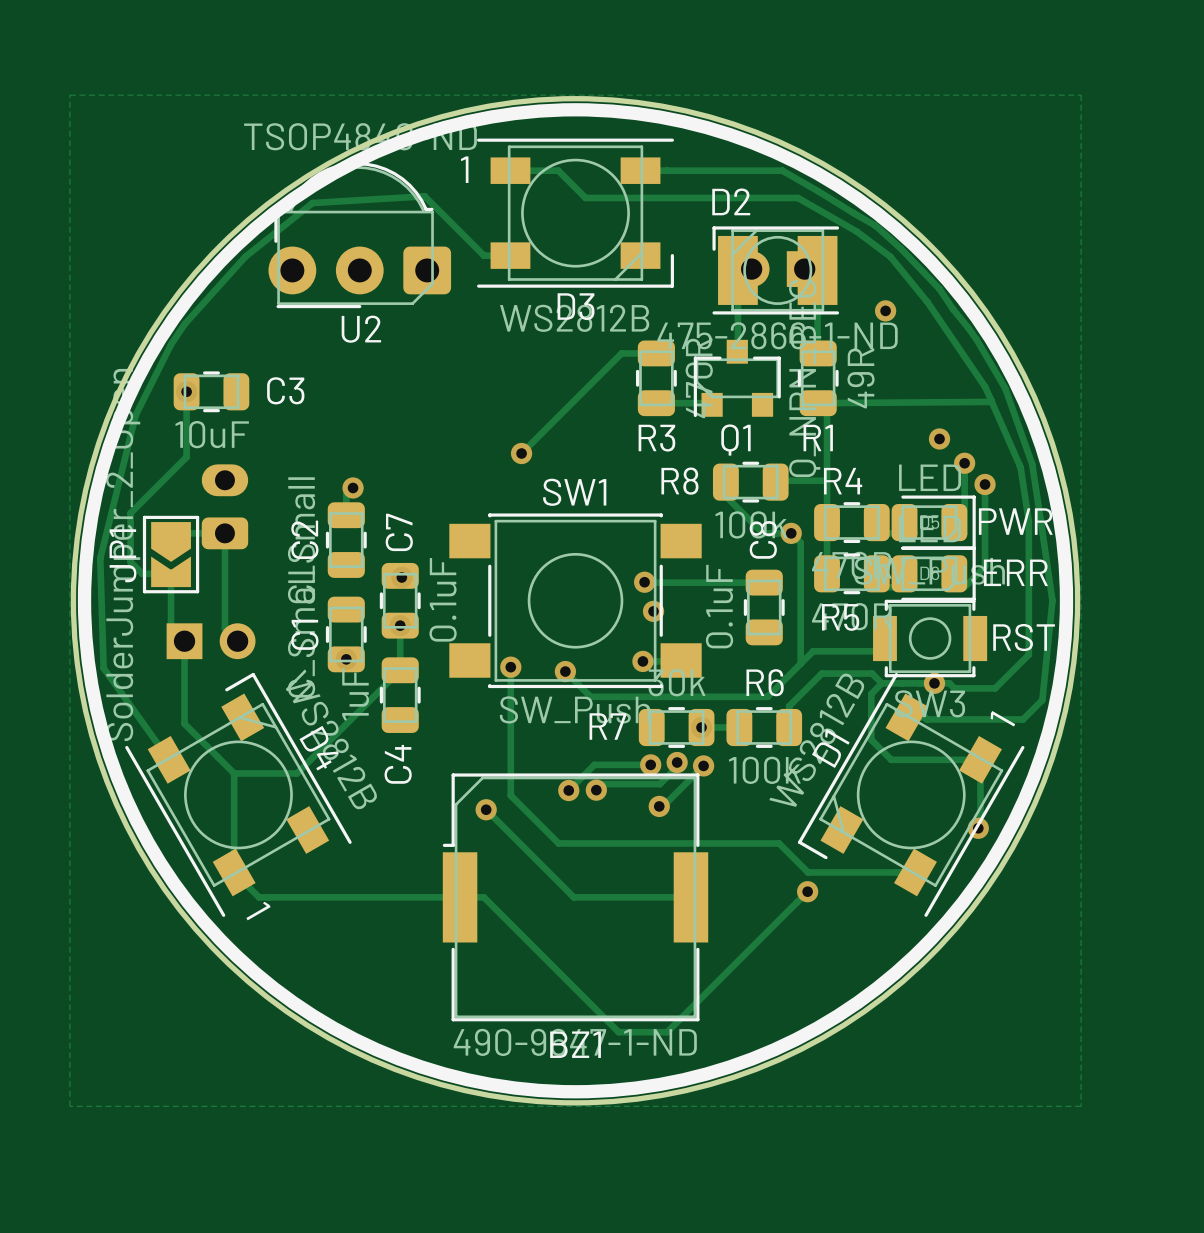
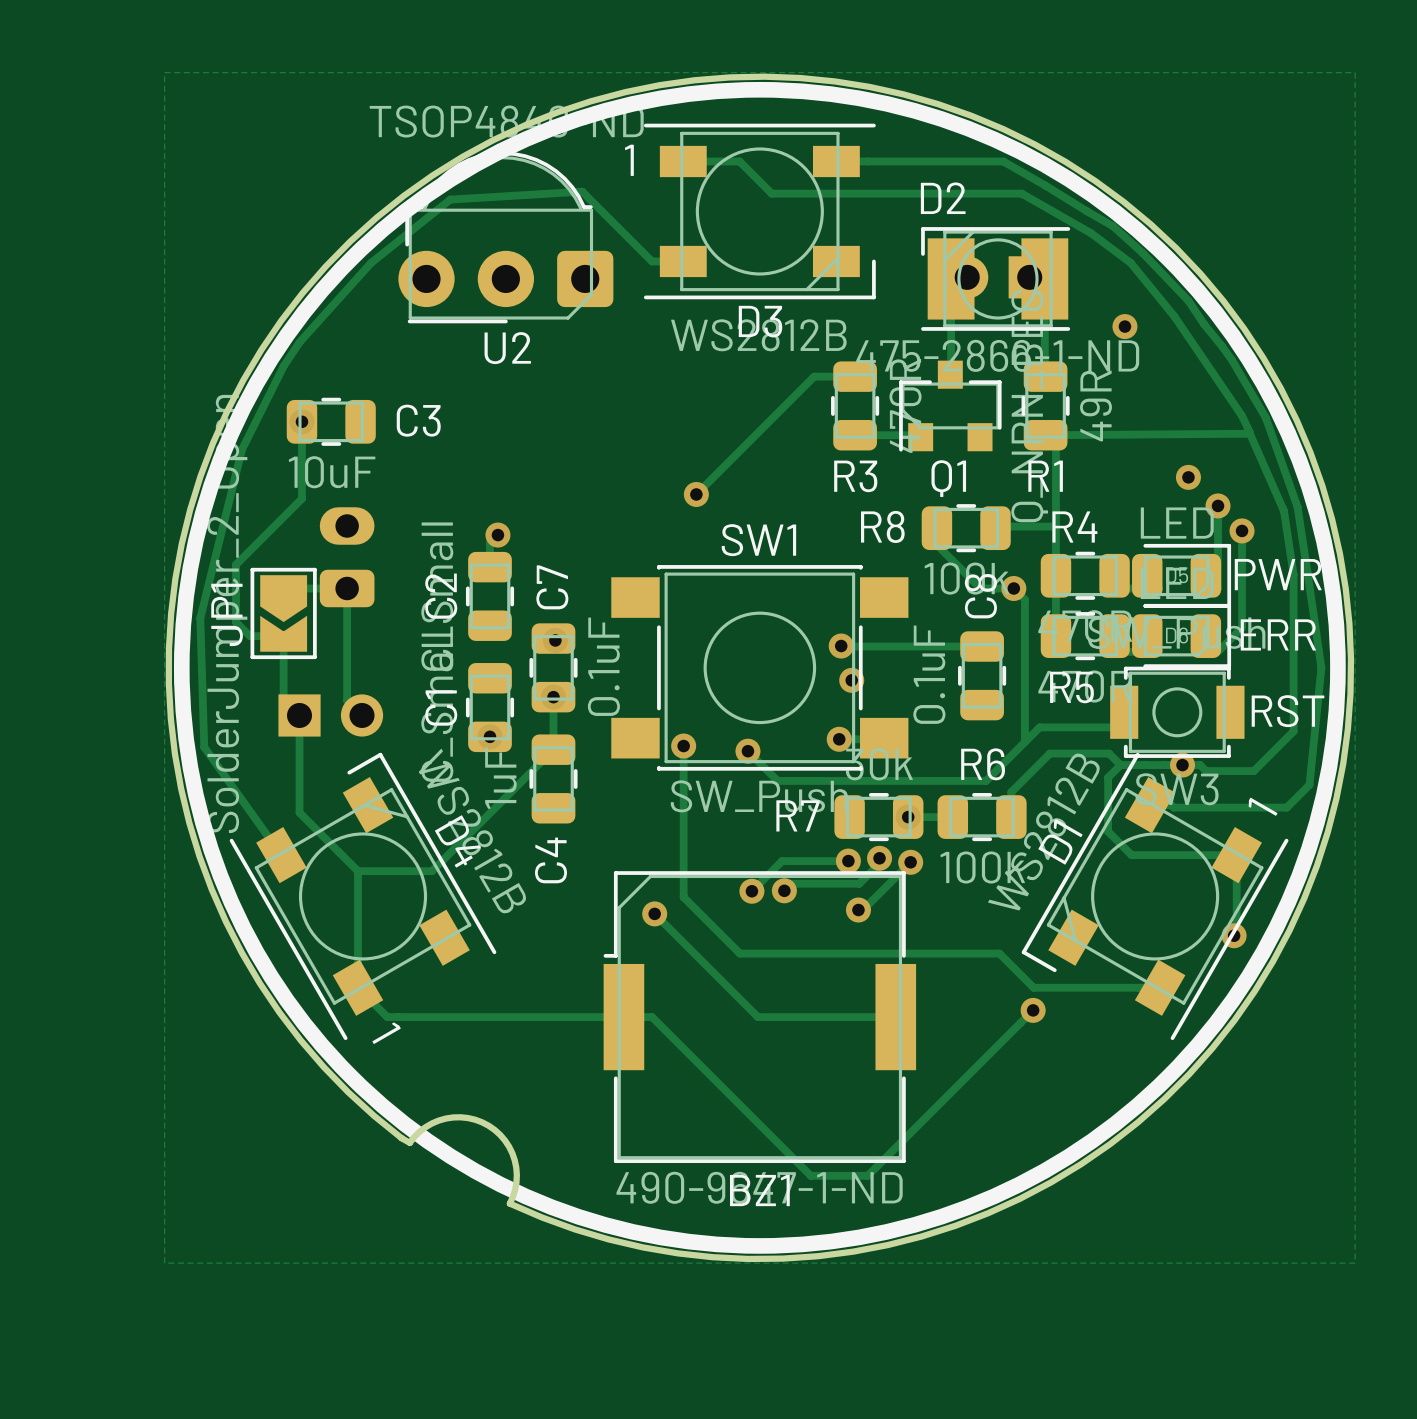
round board edge: [70, 96, 1081, 1106] -> none
board edge: none -> (401, 1138) (409, 1142) (425, 1127) (445, 1118) (467, 1118) (482, 1122) (494, 1129) (505, 1140) (514, 1160) (516, 1182) (509, 1203) (575, 1229) (608, 1239) (677, 1253) (747, 1258) (783, 1258) (853, 1251) (921, 1236) (955, 1225) (1020, 1198) (1051, 1182) (1110, 1144) (1137, 1122) (1189, 1074) (1234, 1020) (1272, 961) (1289, 930) (1316, 865) (1336, 798) (1343, 763) (1350, 693) (1349, 623) (1345, 588) (1339, 553) (1322, 485) (1310, 452) (1281, 388) (1244, 328) (1200, 273) (1150, 224) (1123, 201) (1065, 161) (1003, 129) (937, 104) (904, 94) (869, 86) (799, 78) (764, 76) (694, 80) (625, 92) (557, 112) (525, 125) (462, 156) (403, 195) (350, 241) (302, 293) (281, 320) (243, 380) (212, 443) (190, 510) (181, 544) (175, 578) (168, 648) (170, 719) (174, 753) (181, 788) (199, 856) (211, 889) (241, 952) (279, 1012) (323, 1067) (374, 1115) (401, 1138)

